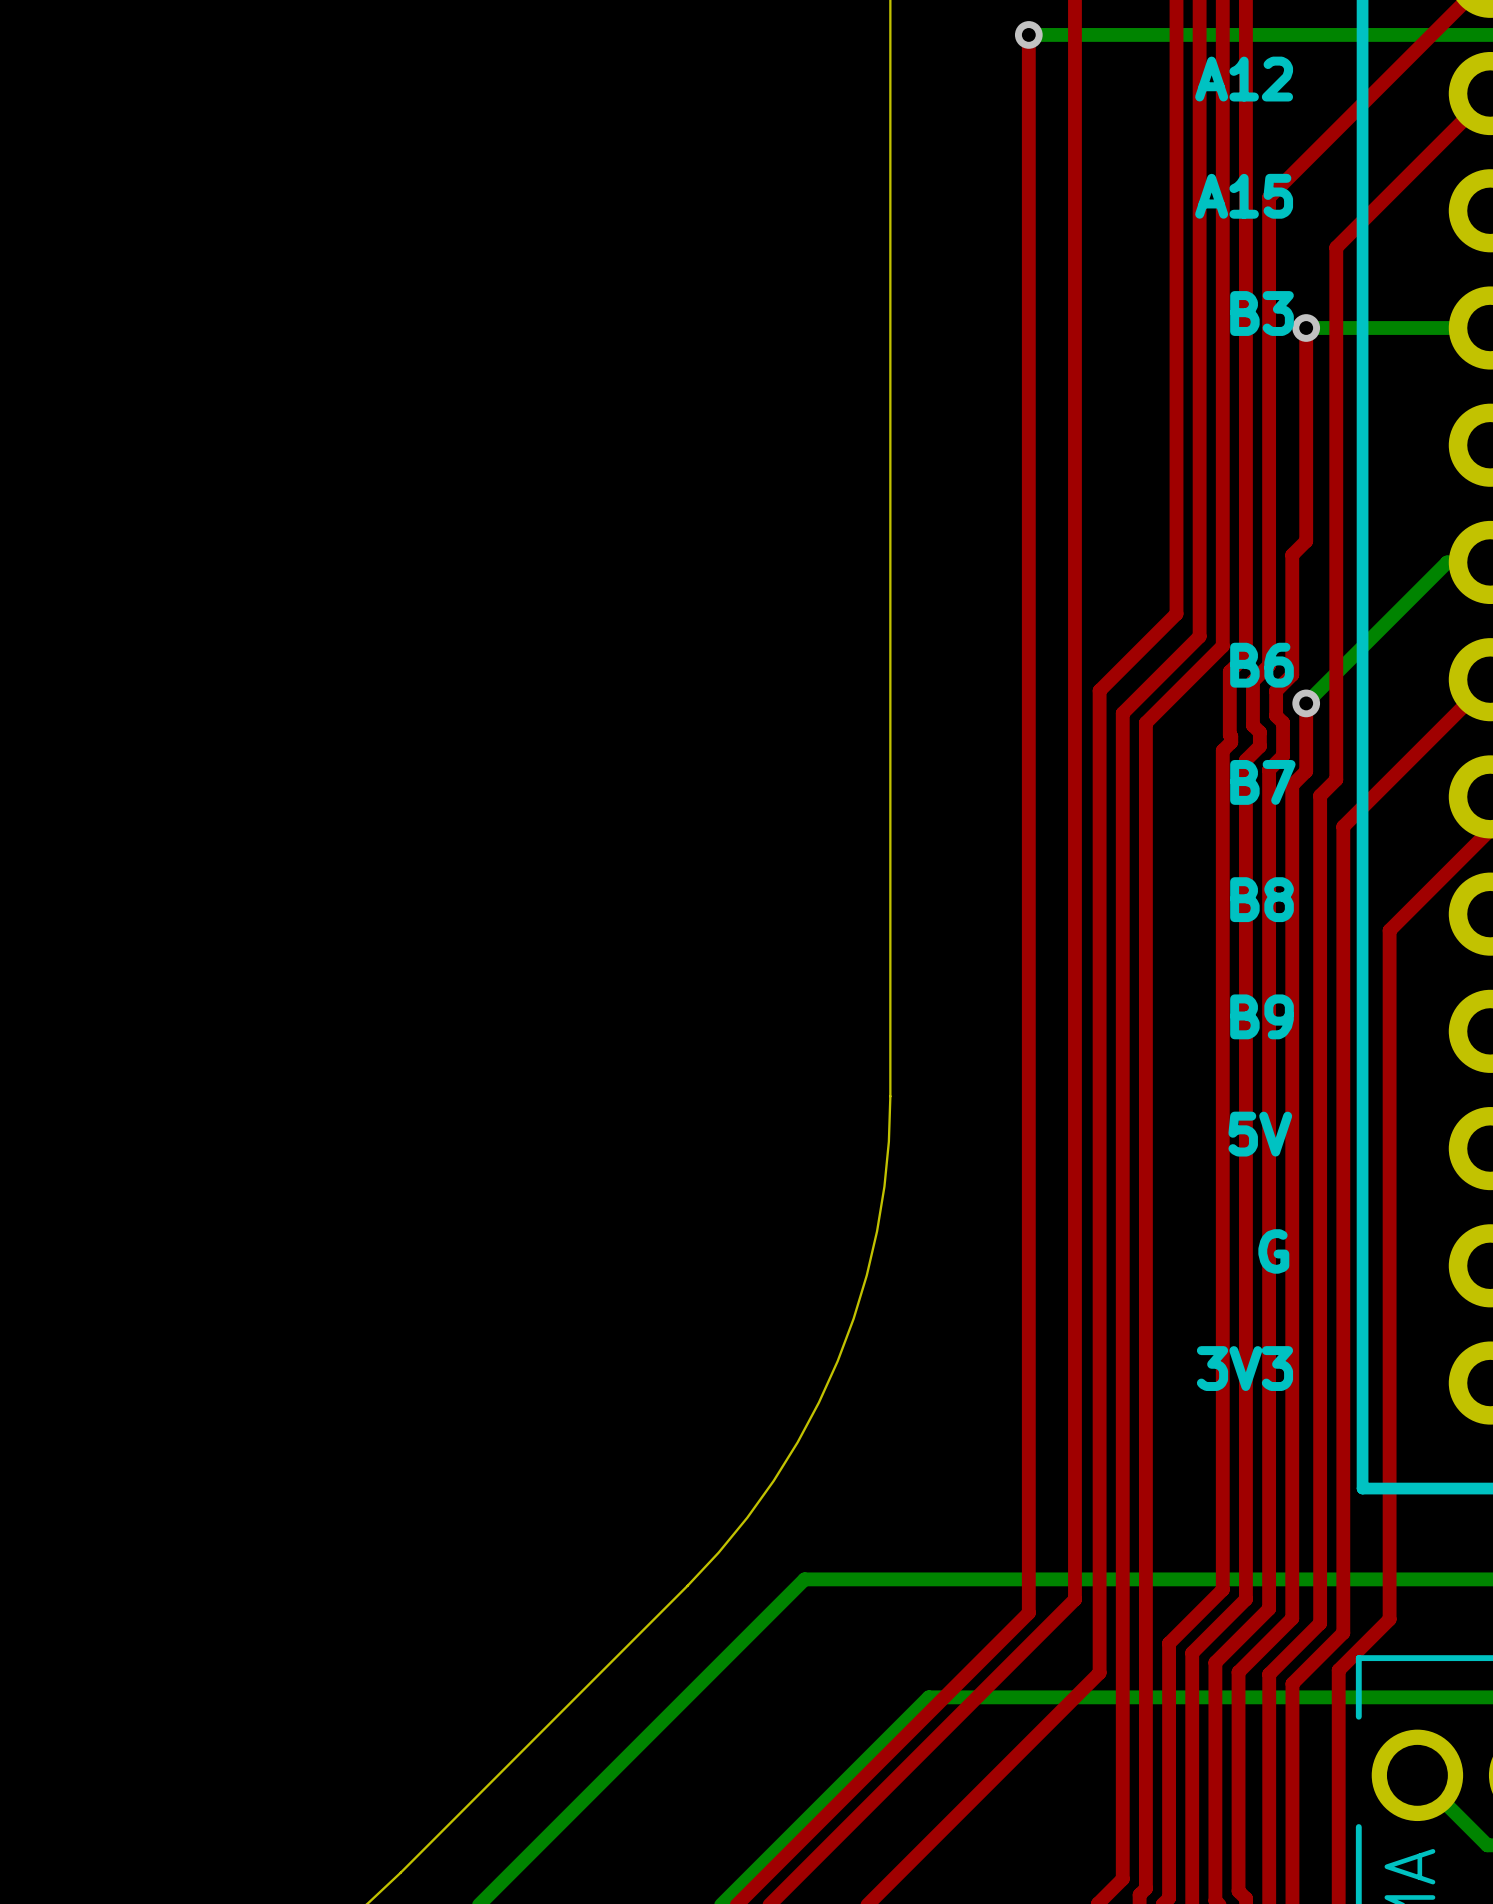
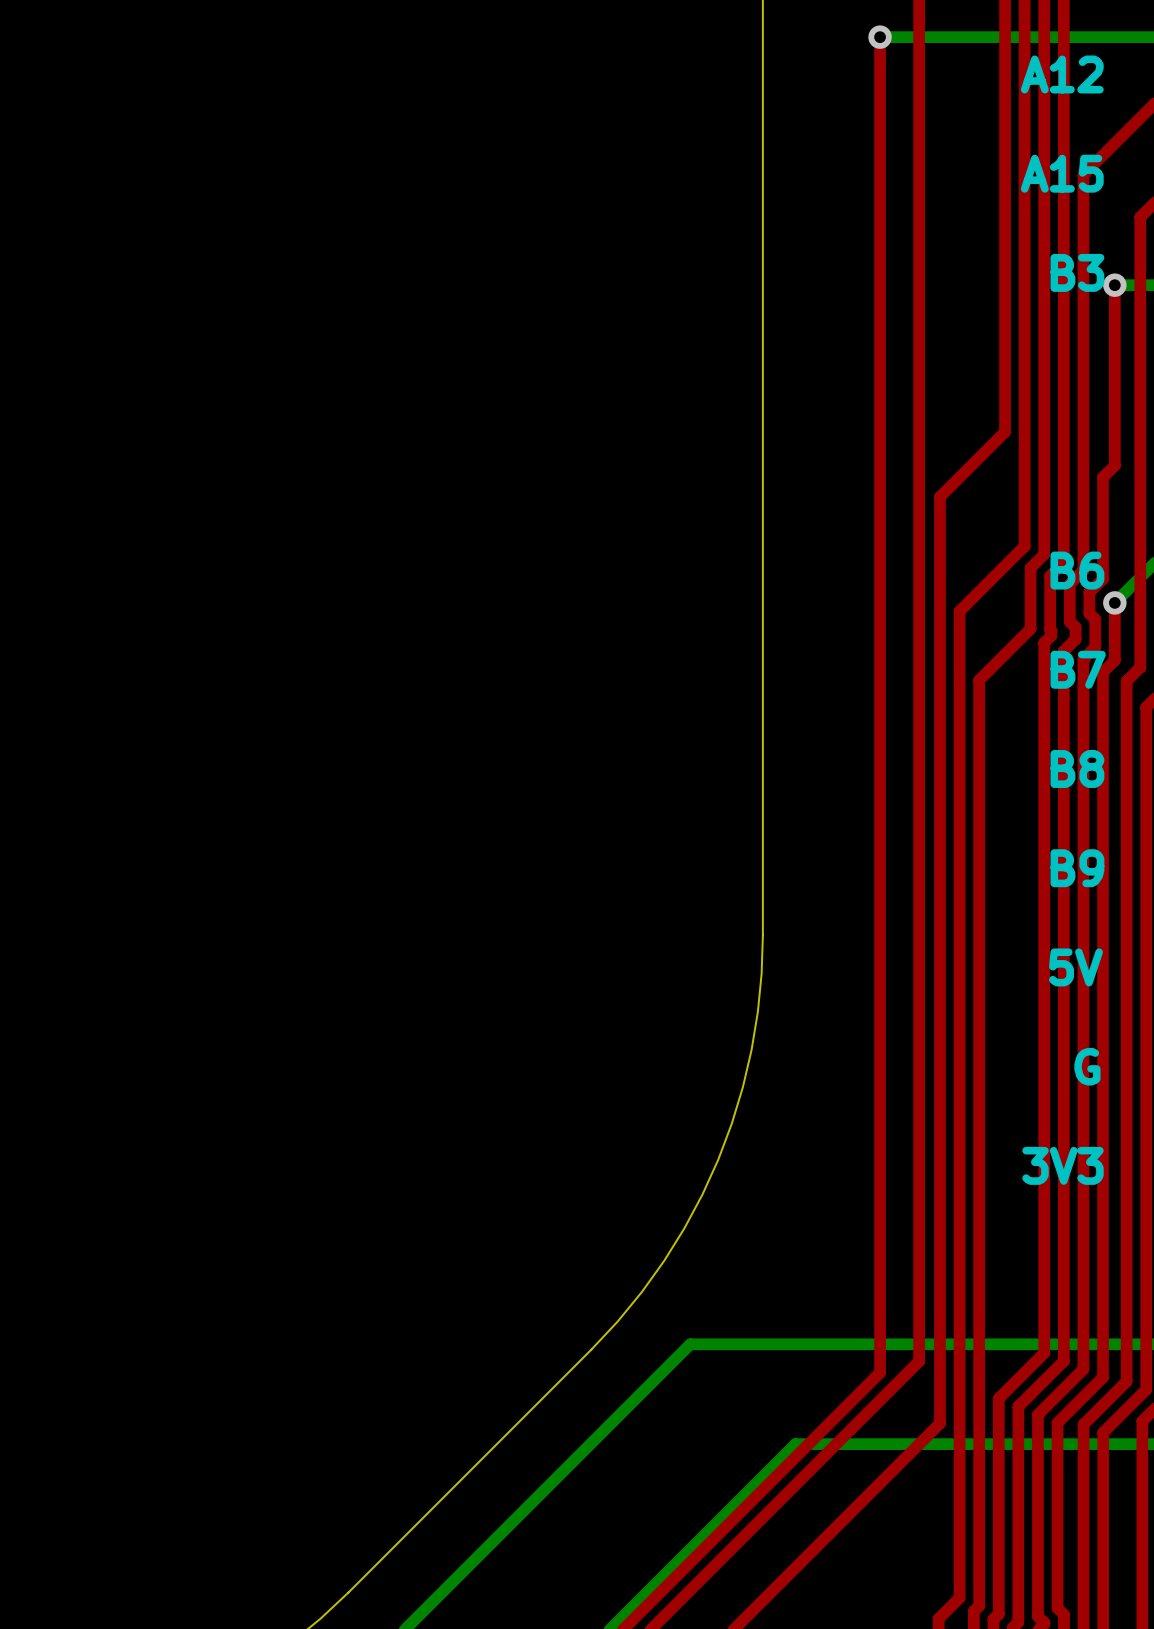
top track: (1176, 501) (1176, 613) (1099, 690) -> (1005, 431) (939, 496) (939, 592)
top track: (1206, 662) (1145, 722) (1145, 794) -> (1030, 568) (1030, 628) (979, 680)

